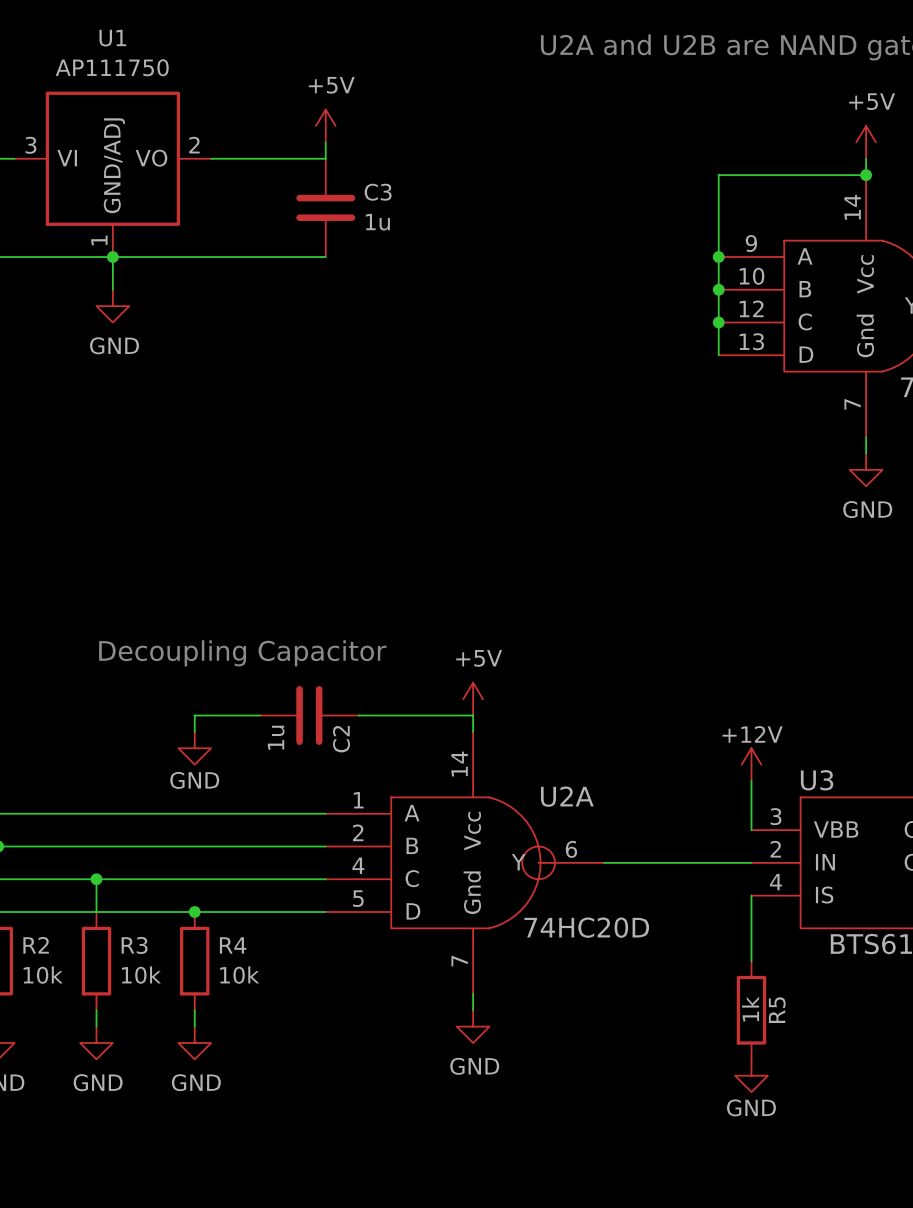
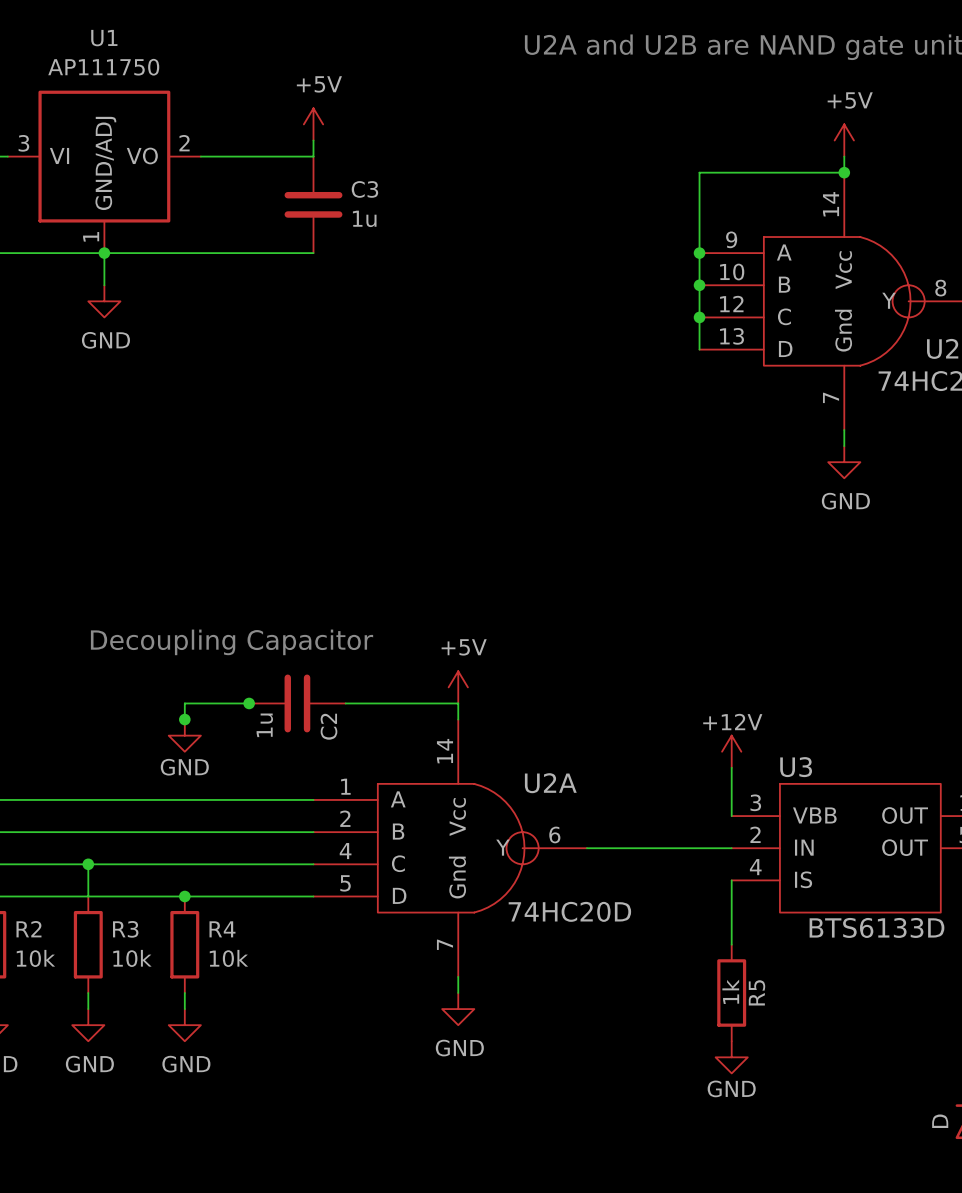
junction: none -> (249, 703)
junction: none -> (184, 719)

